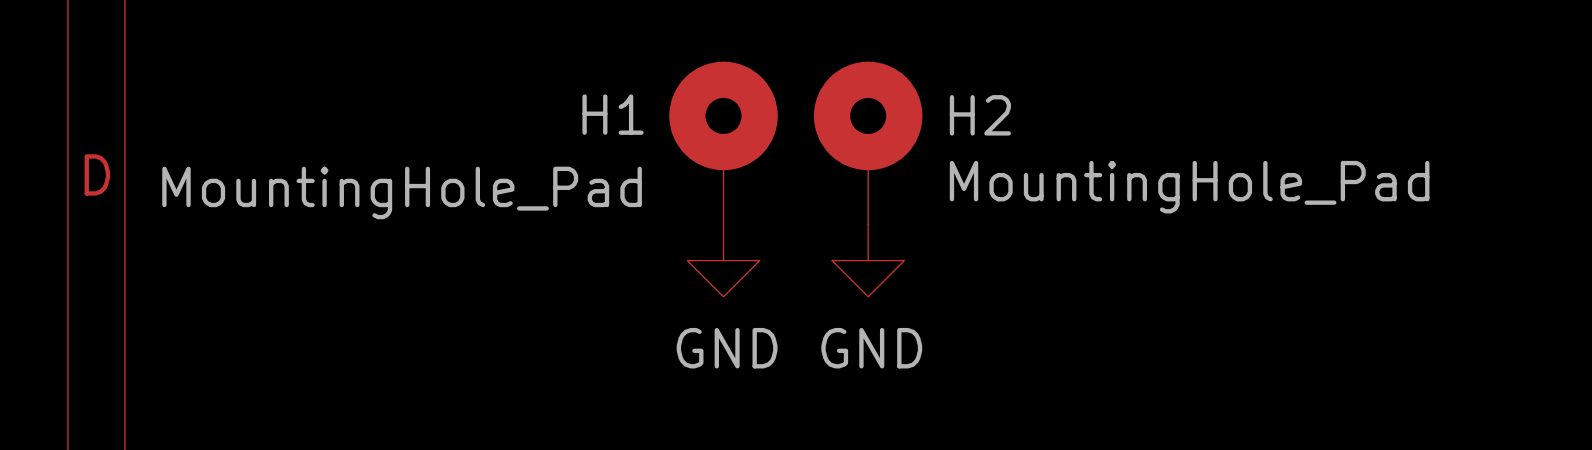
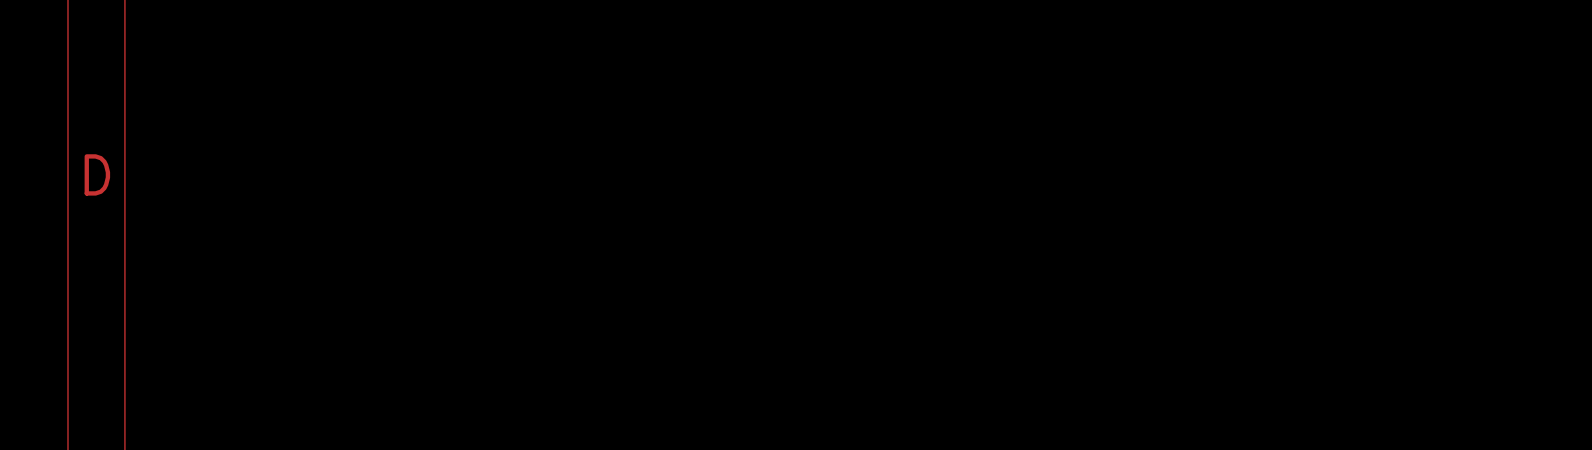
H1: MountingHole_Pad (723, 143) -> none
H2: MountingHole_Pad (868, 143) -> none
power symbol: GND (723, 260) -> none
power symbol: GND (868, 260) -> none

